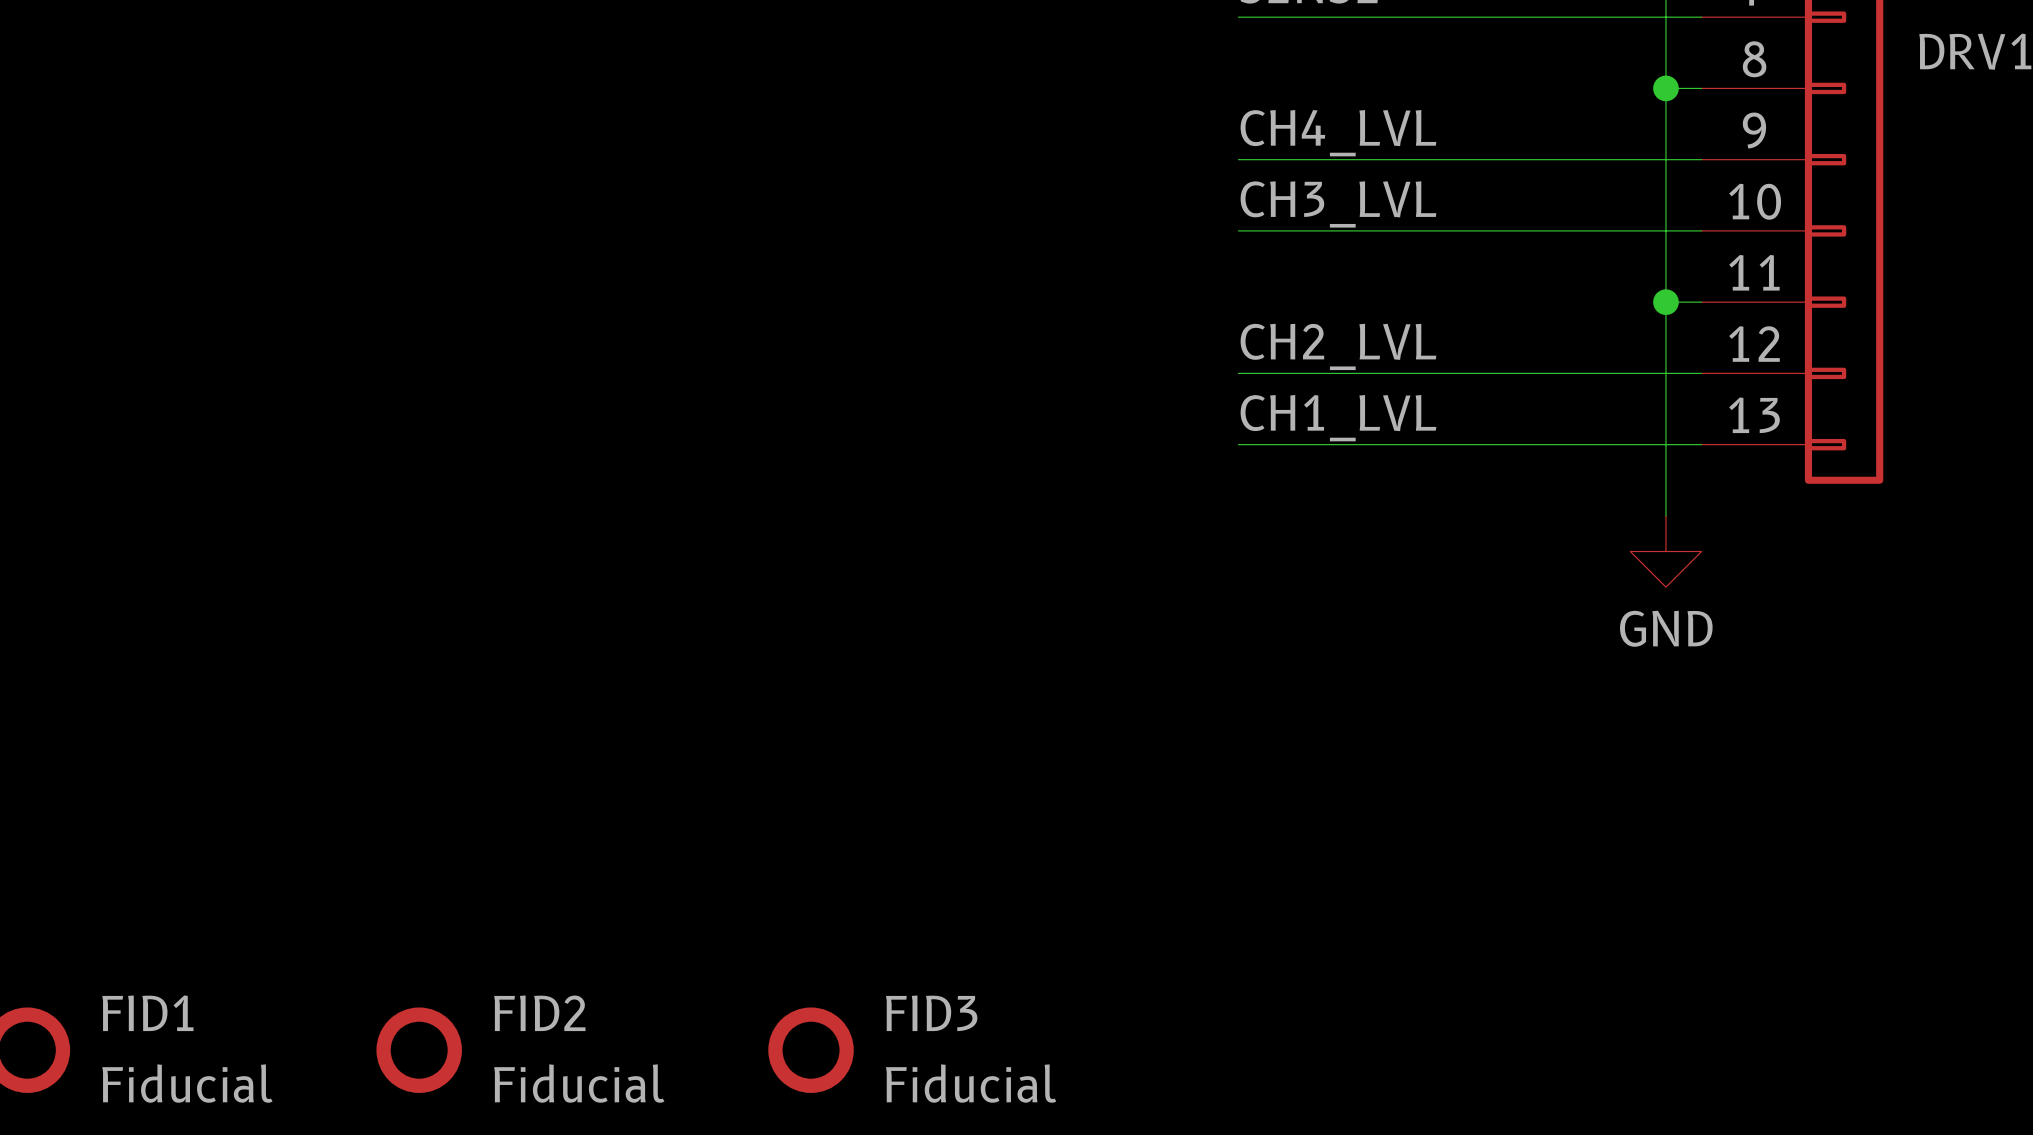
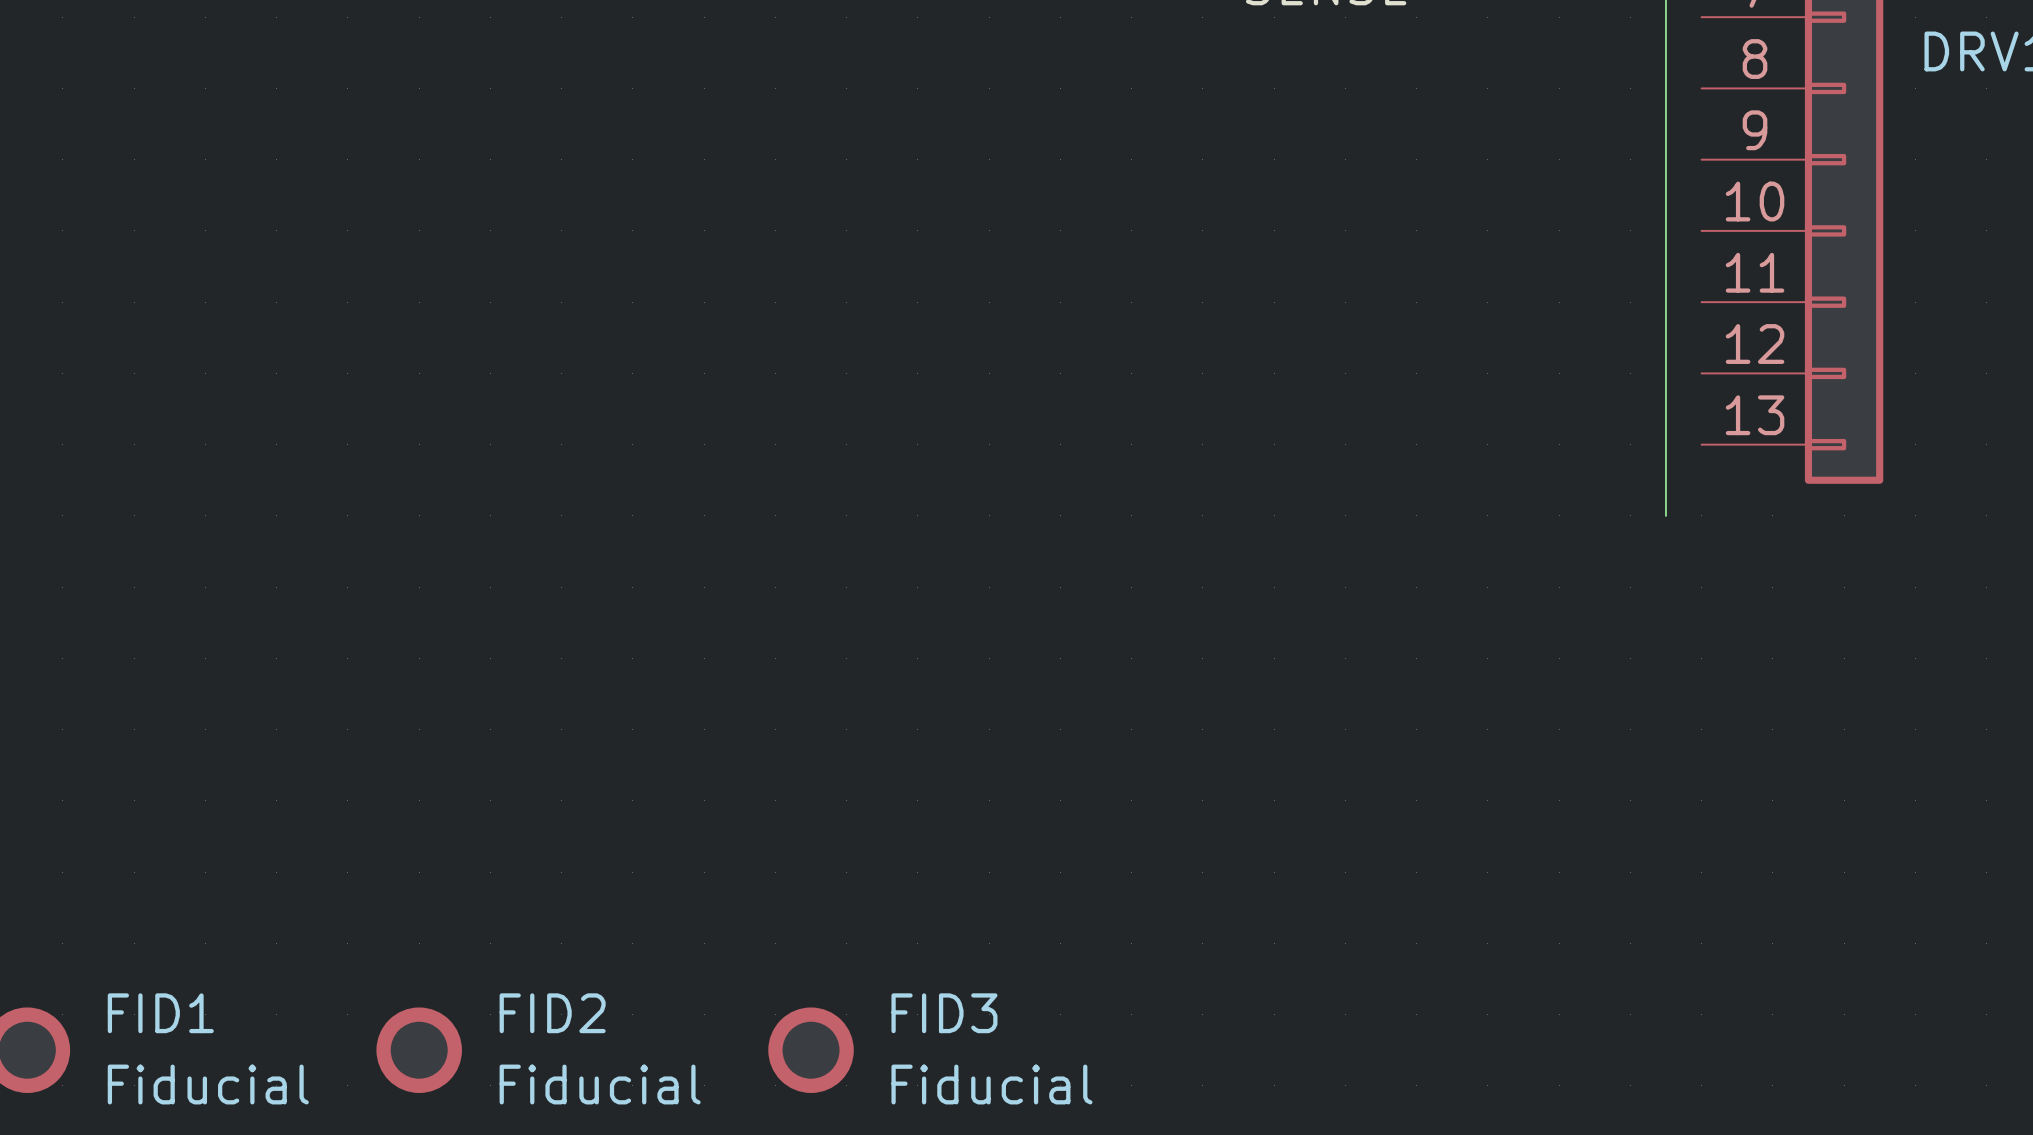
wire: (1238, 17) (1701, 17) -> none
wire: (1665, 88) (1701, 88) -> none
junction: (1665, 88) -> none
label: CH4_LVL (1338, 133) -> none
wire: (1238, 159) (1701, 159) -> none
label: CH3_LVL (1338, 204) -> none
wire: (1238, 230) (1701, 230) -> none
wire: (1665, 302) (1701, 302) -> none
junction: (1665, 302) -> none
label: CH2_LVL (1338, 346) -> none
wire: (1238, 373) (1701, 373) -> none
label: CH1_LVL (1338, 418) -> none
wire: (1238, 444) (1701, 444) -> none
power symbol: GND (1665, 551) -> none

